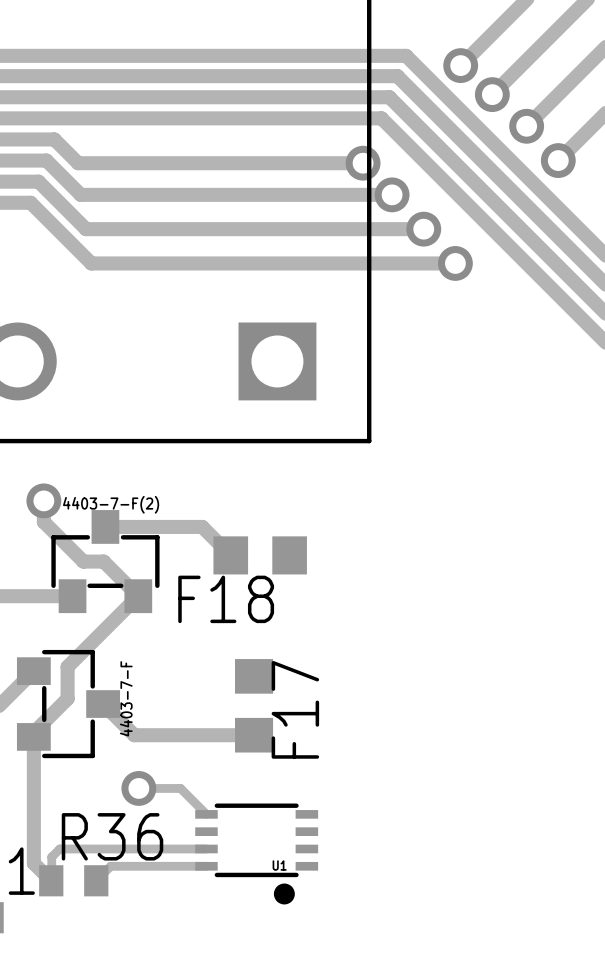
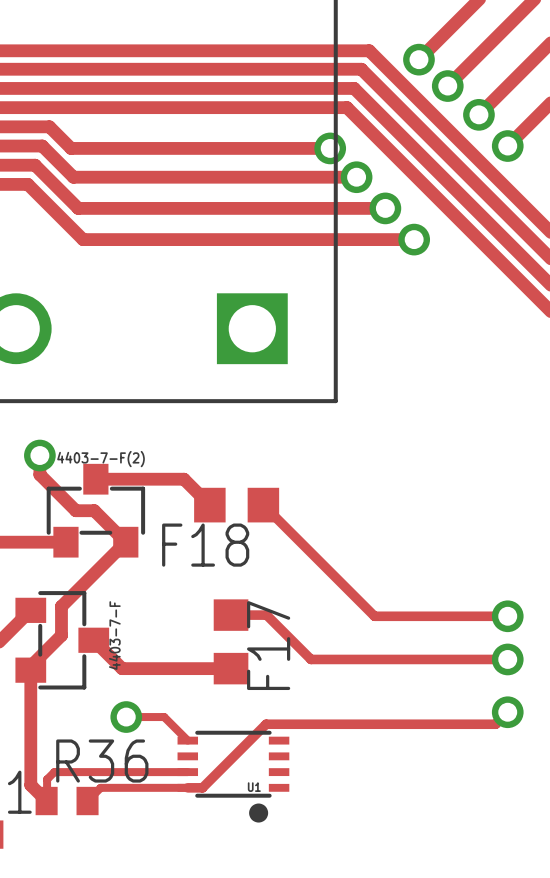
track: none -> (263, 505) (374, 616) (507, 616)
track: none -> (231, 615) (266, 615) (311, 659) (507, 659)
via: none -> (507, 616)
via: none -> (507, 659)
track: none -> (507, 712) (495, 724) (266, 724) (202, 787) (187, 787)
via: none -> (507, 712)

